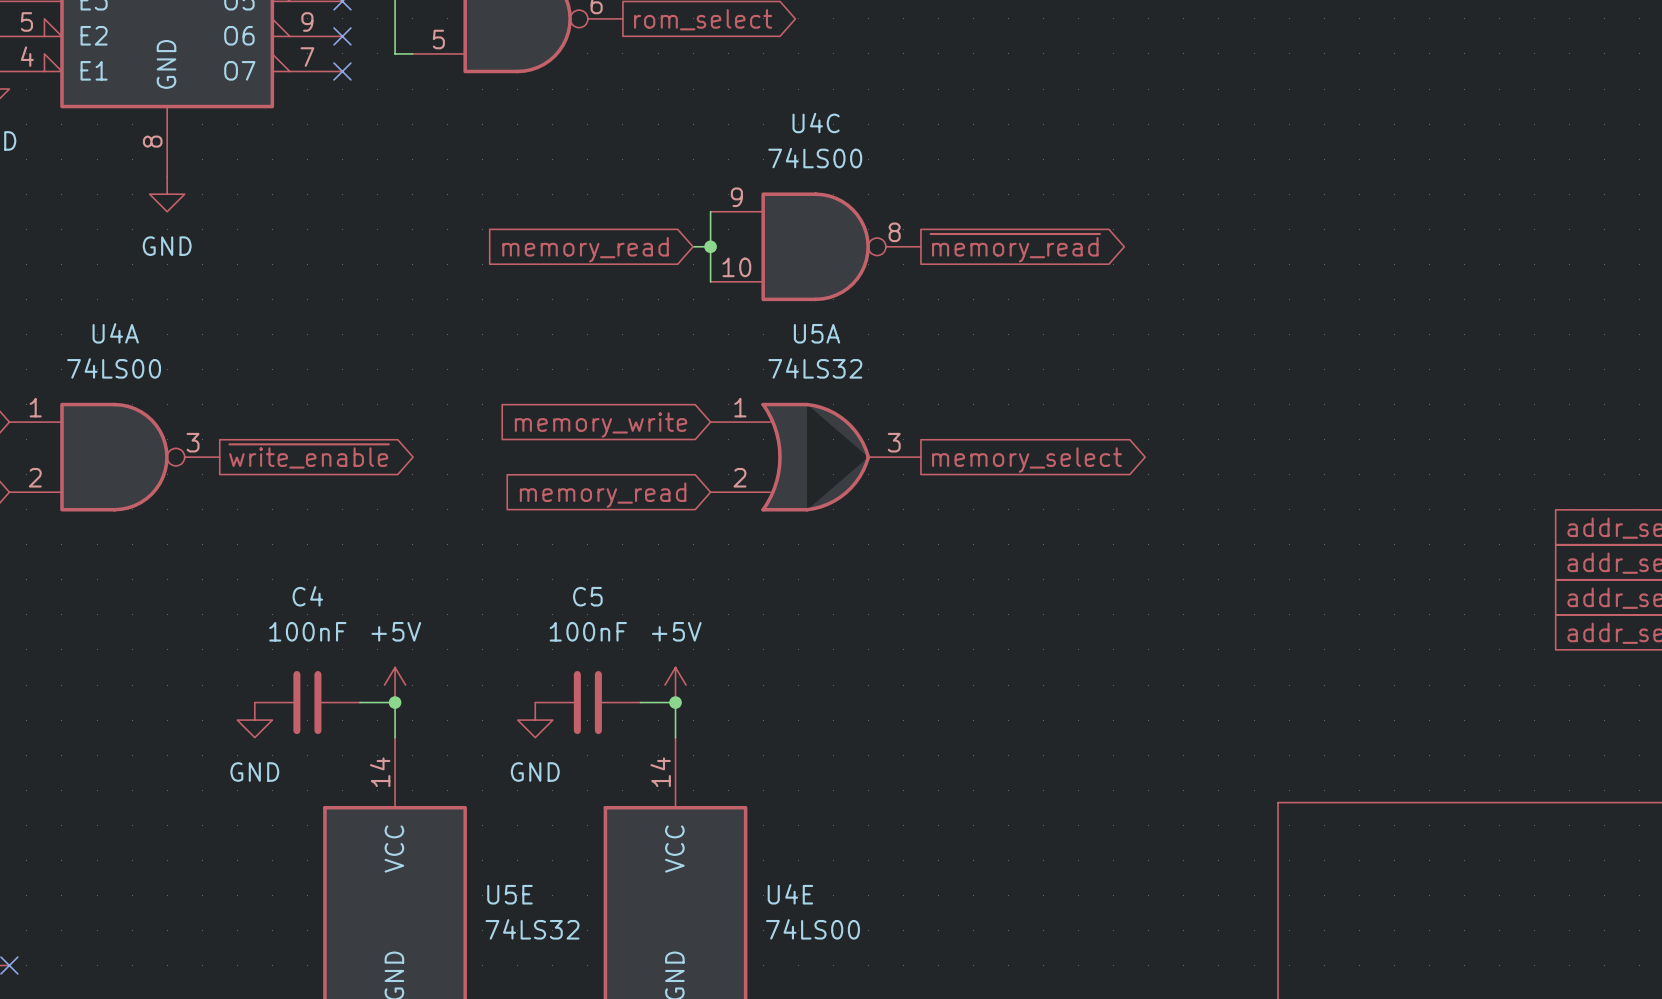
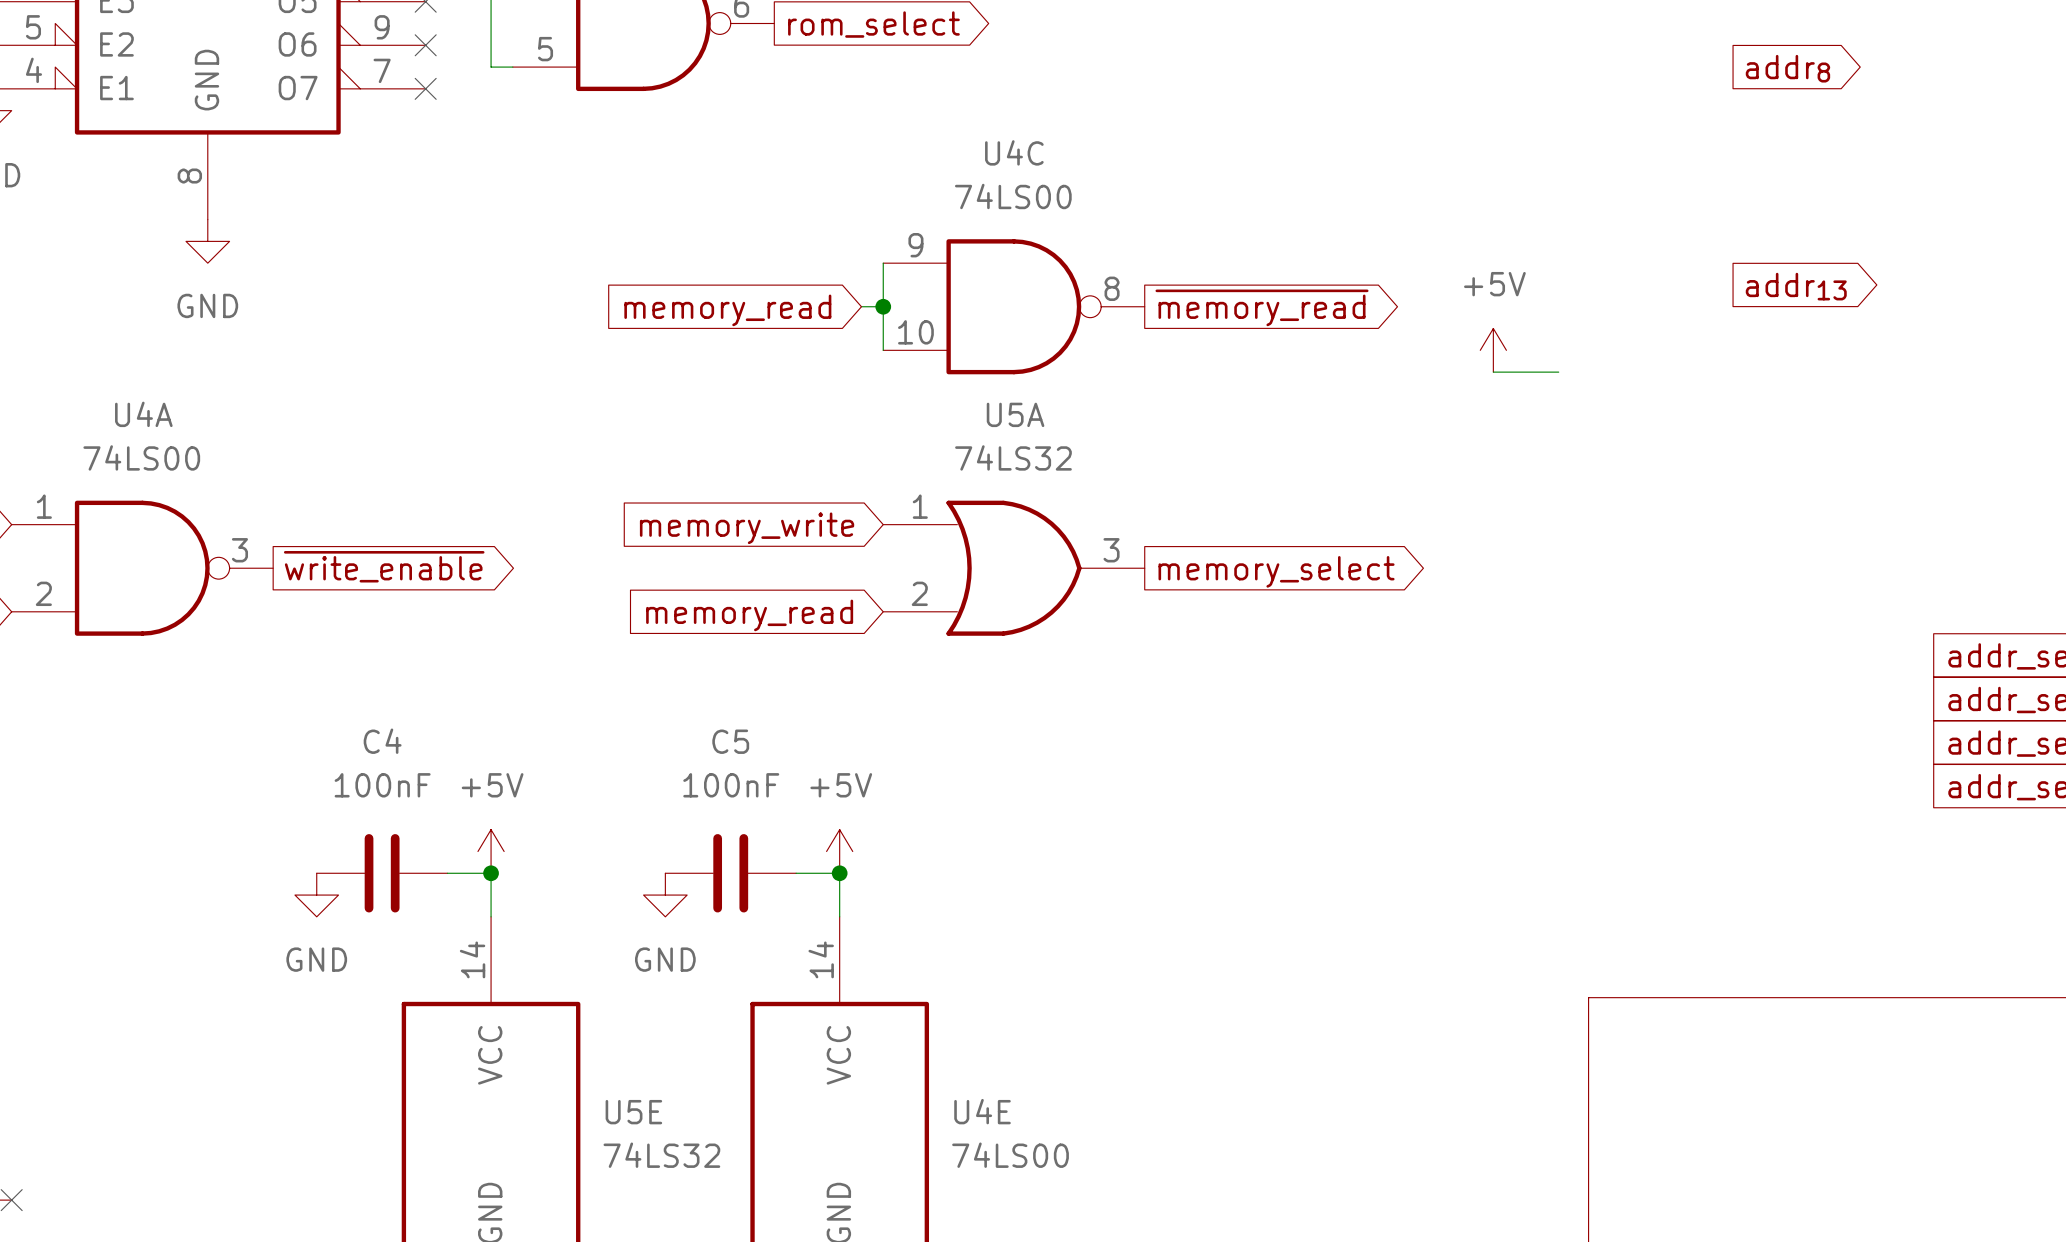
global label: none -> addr8 (1787, 68)
global label: none -> addr13 (1796, 286)
power symbol: none -> +5V (1493, 350)
wire: none -> (1493, 372) (1558, 372)

